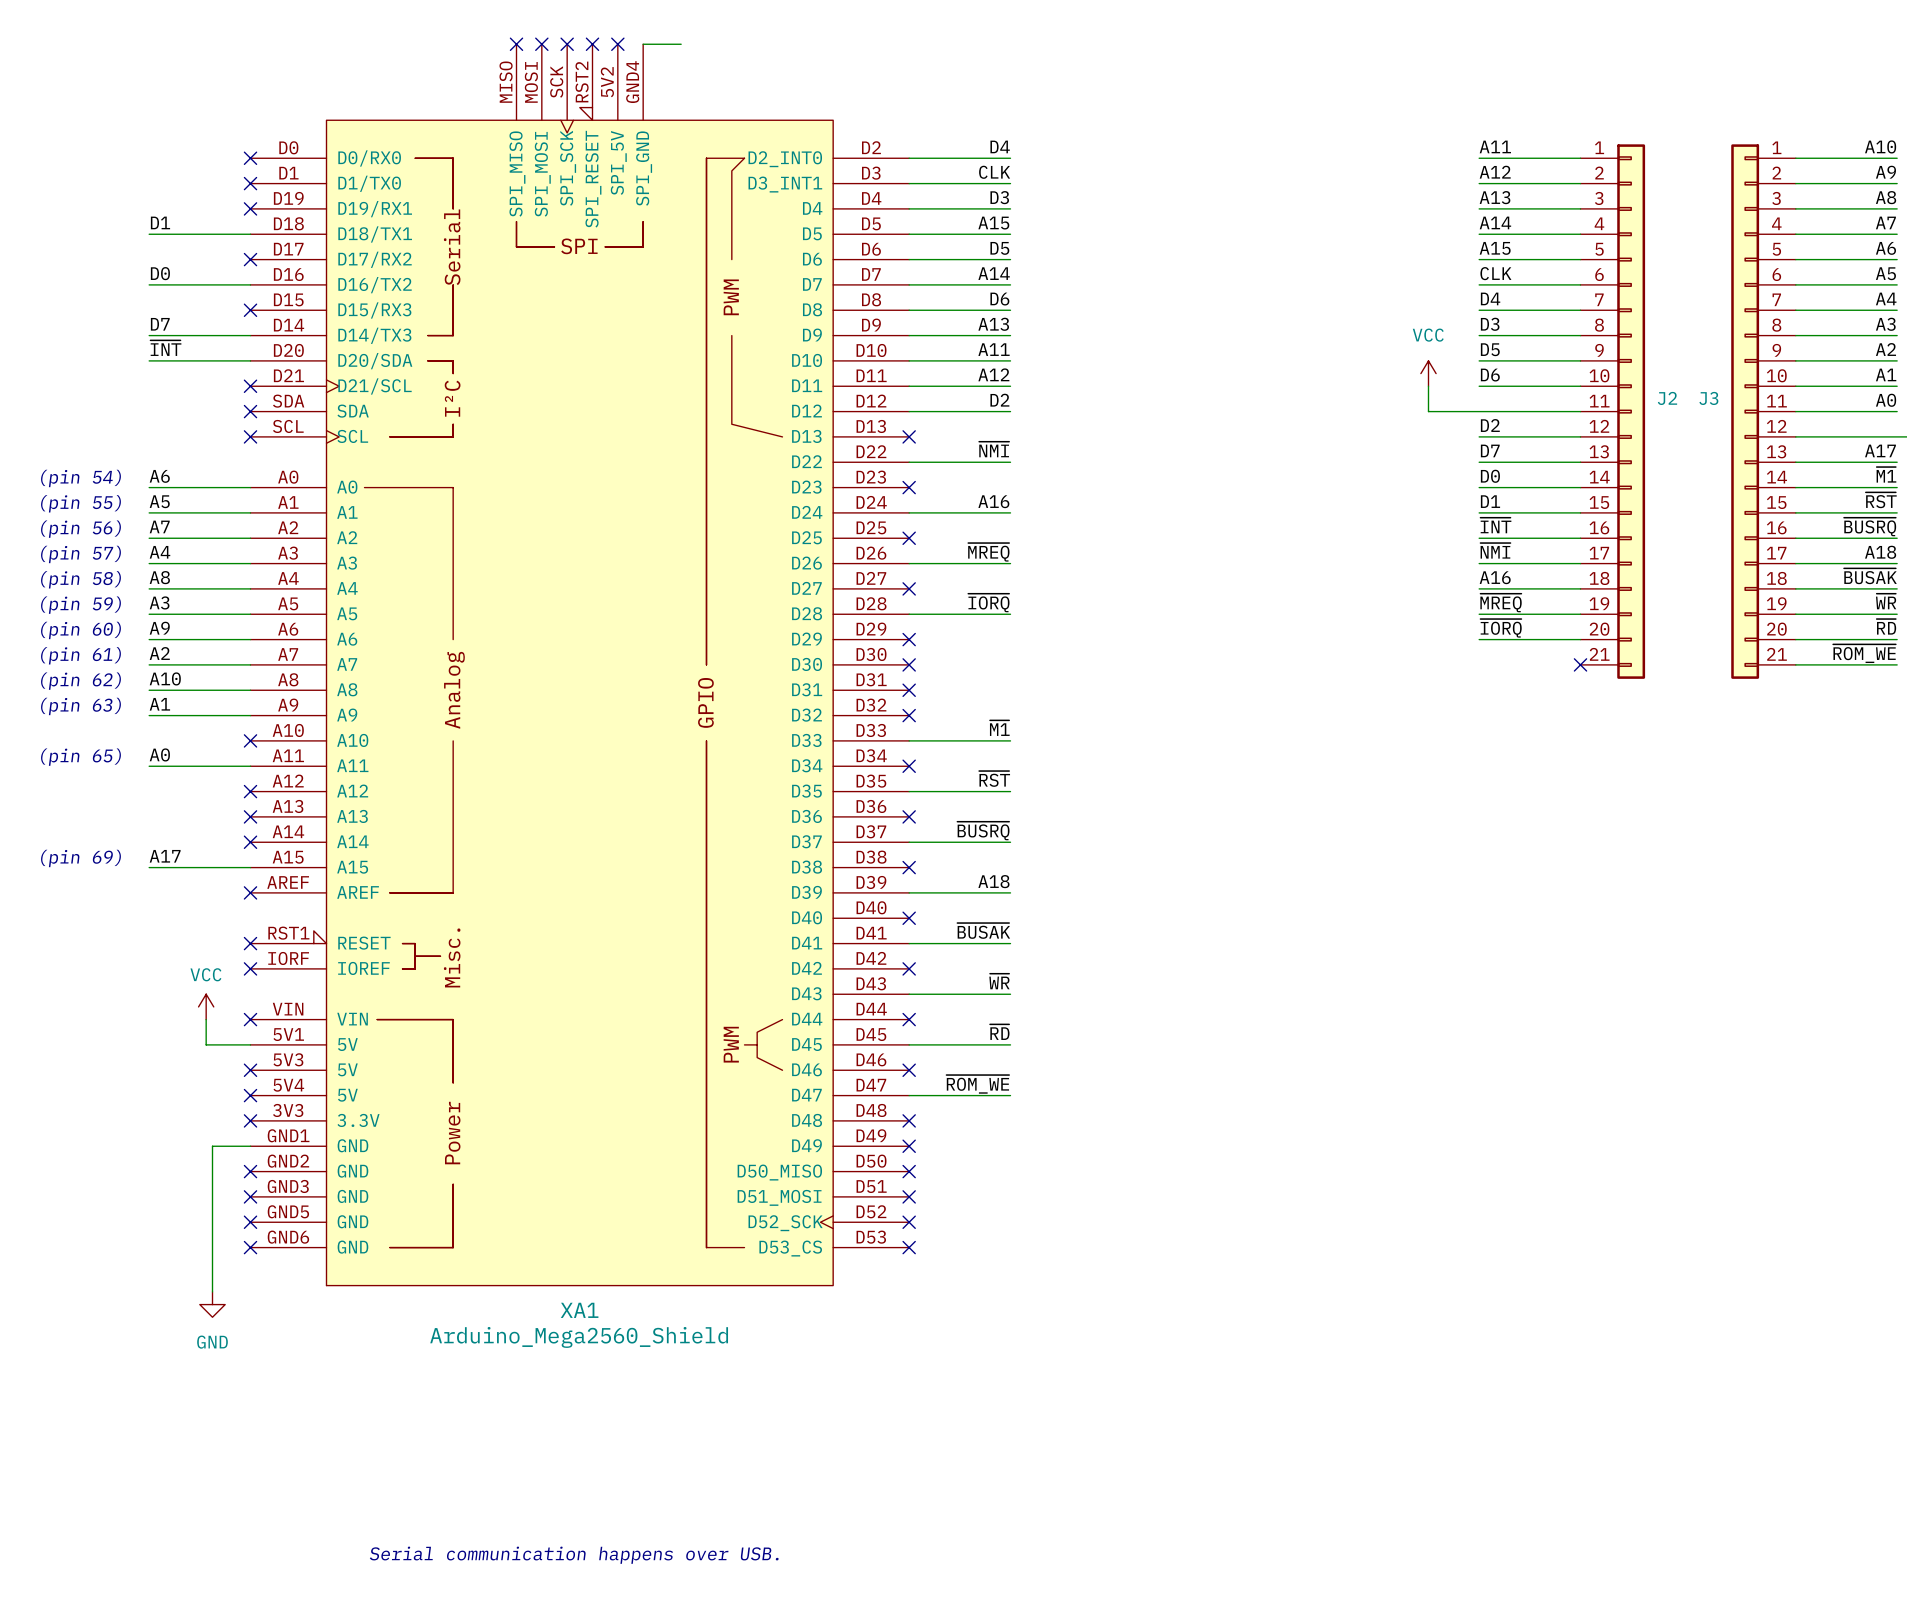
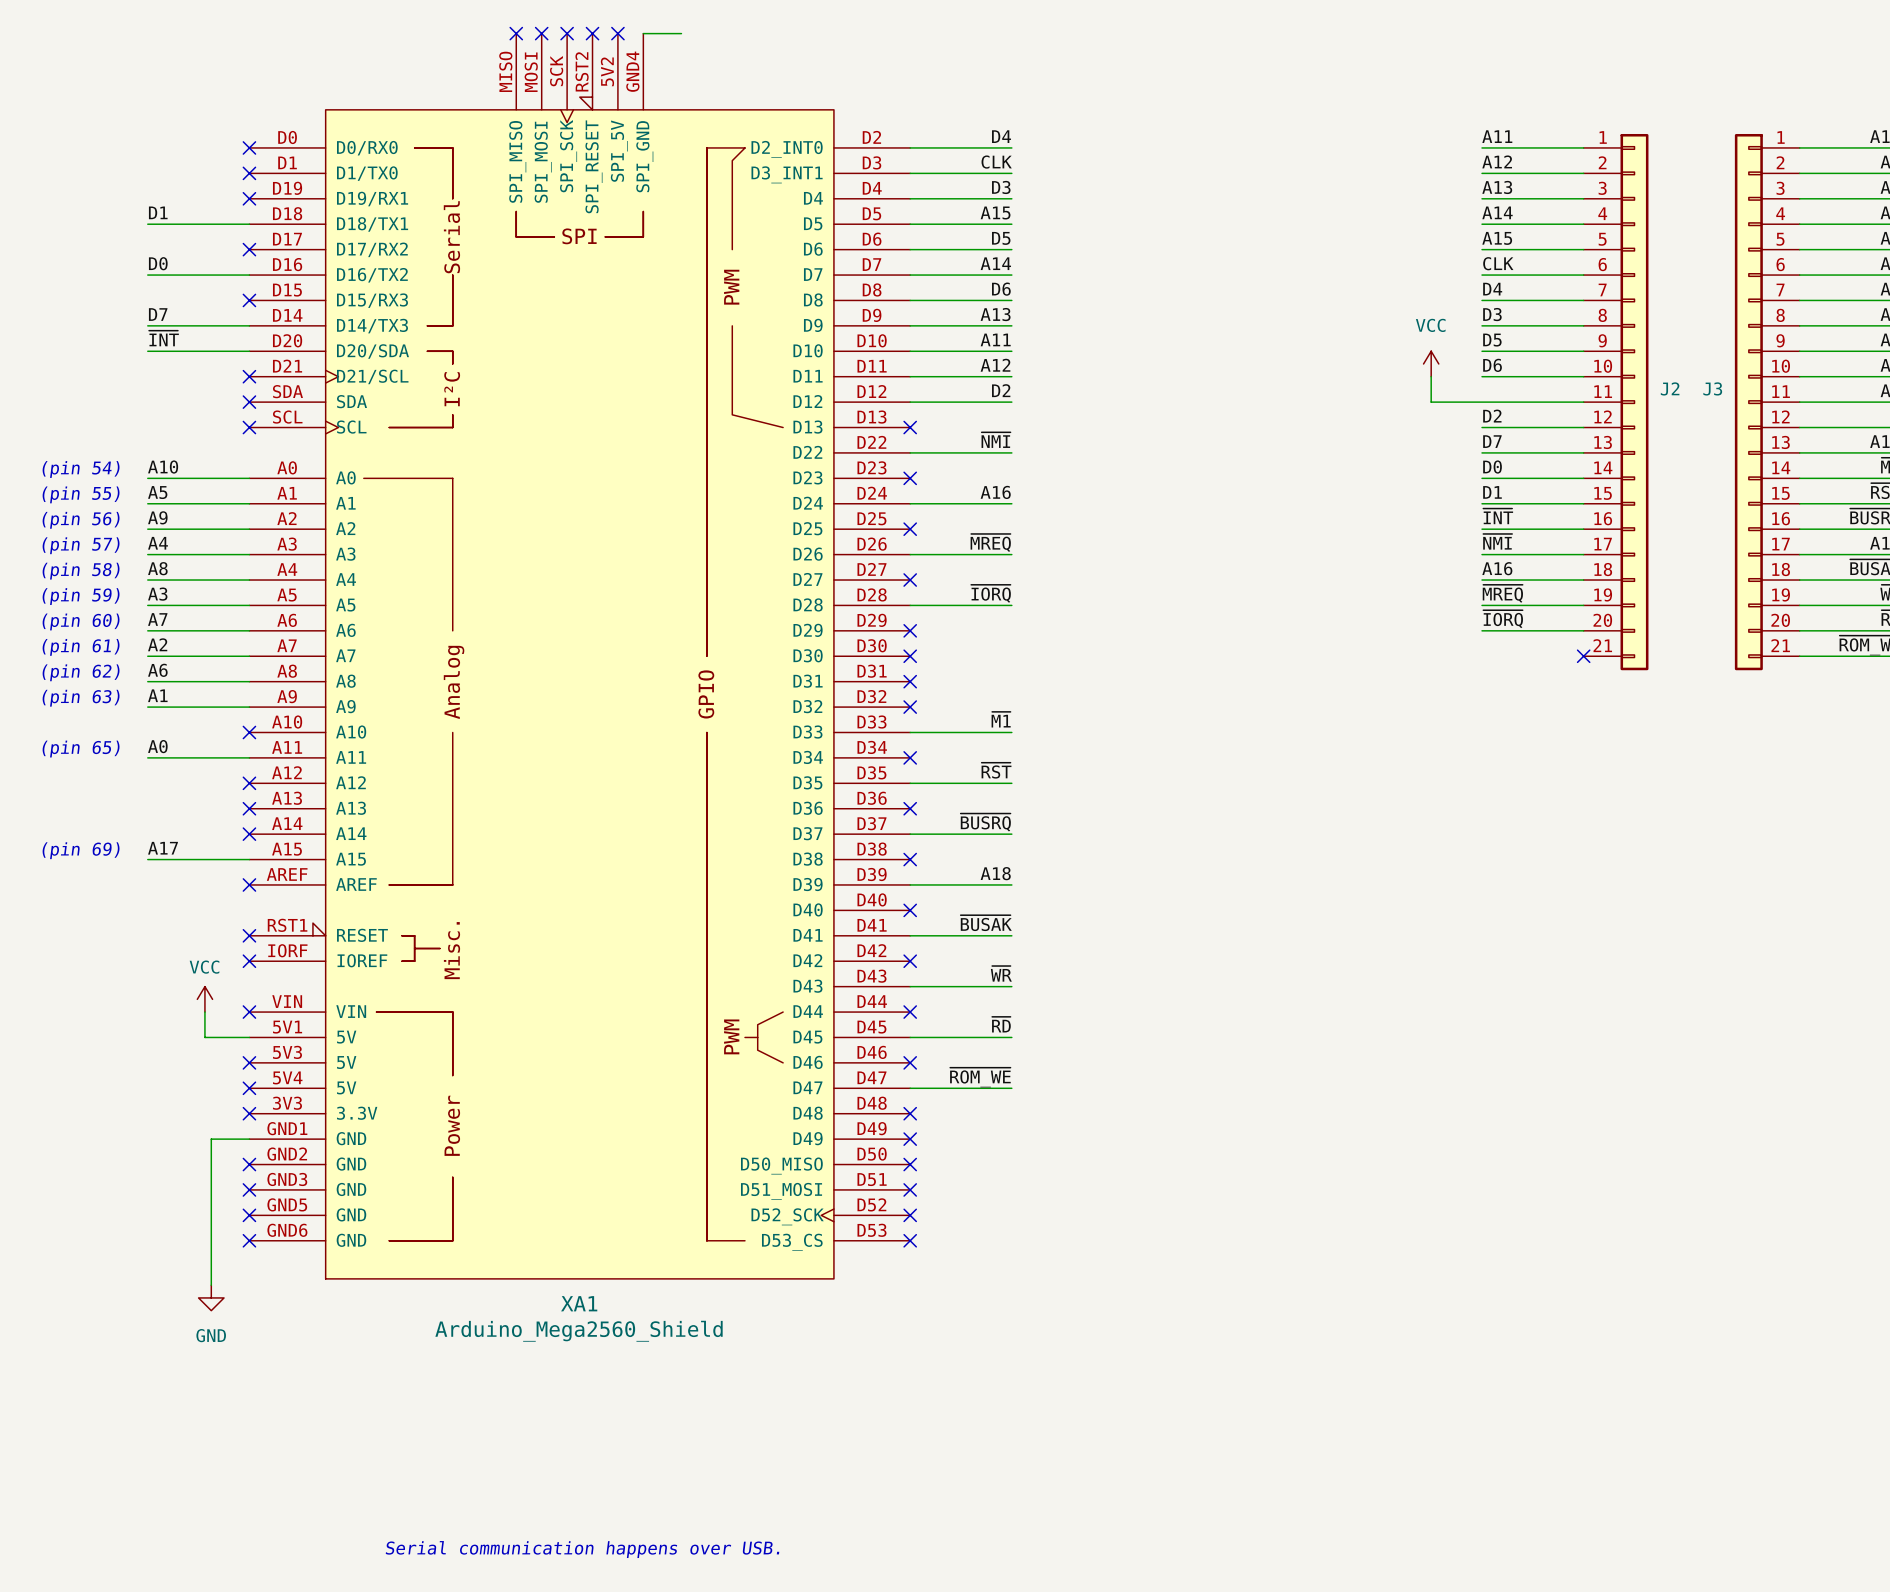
label: A6 (159, 476) -> A10 (163, 467)
label: A7 (159, 526) -> A9 (157, 517)
label: A9 (159, 628) -> A7 (157, 619)
label: A10 (165, 678) -> A6 (157, 670)

